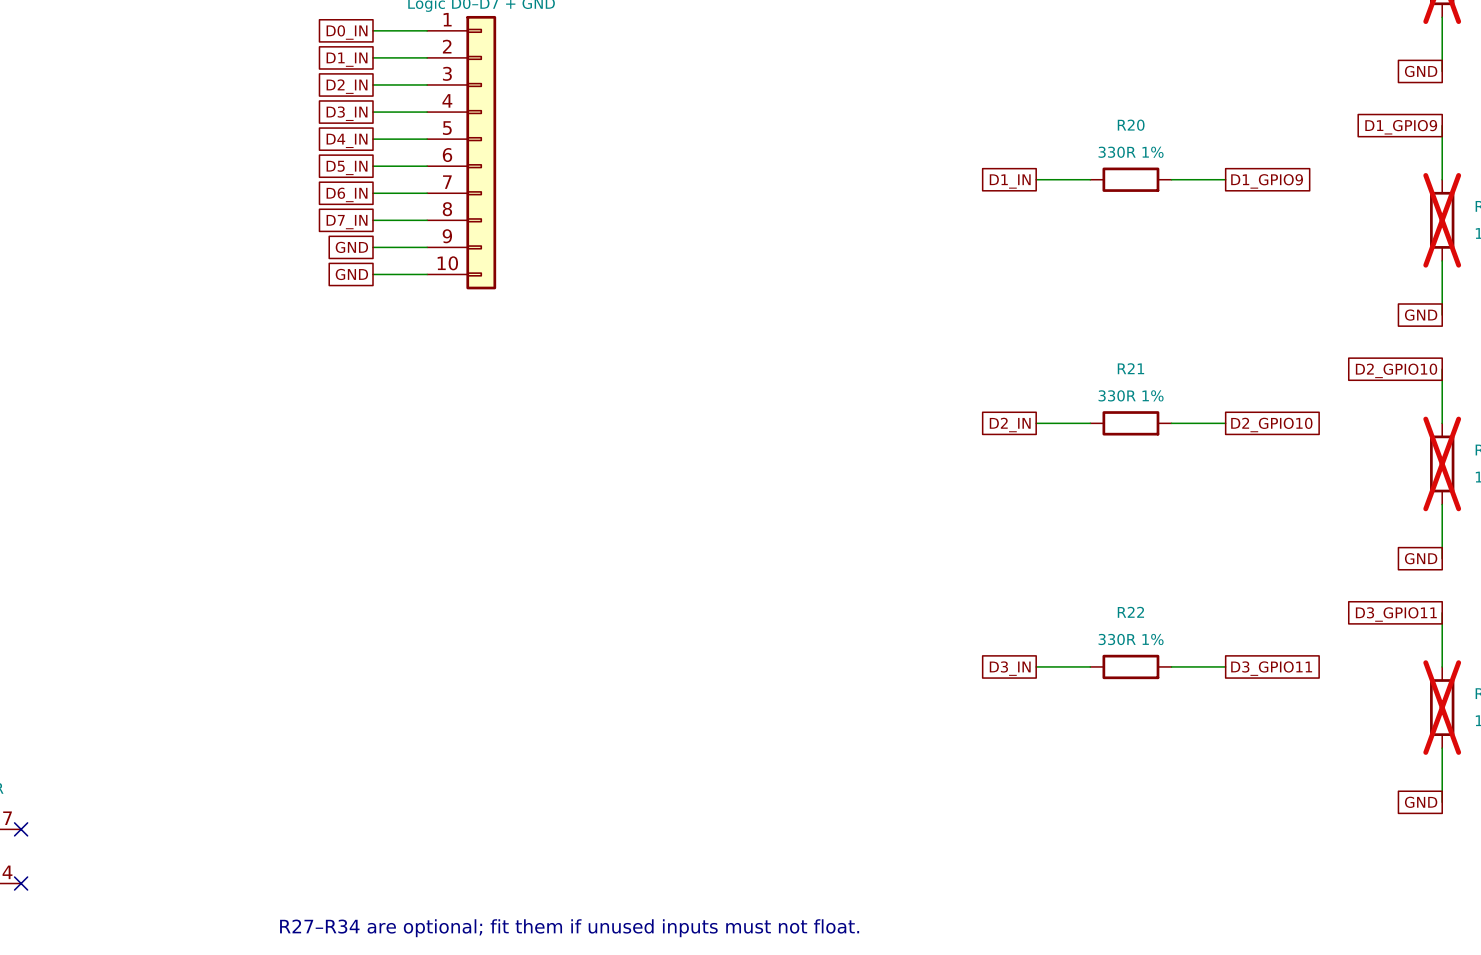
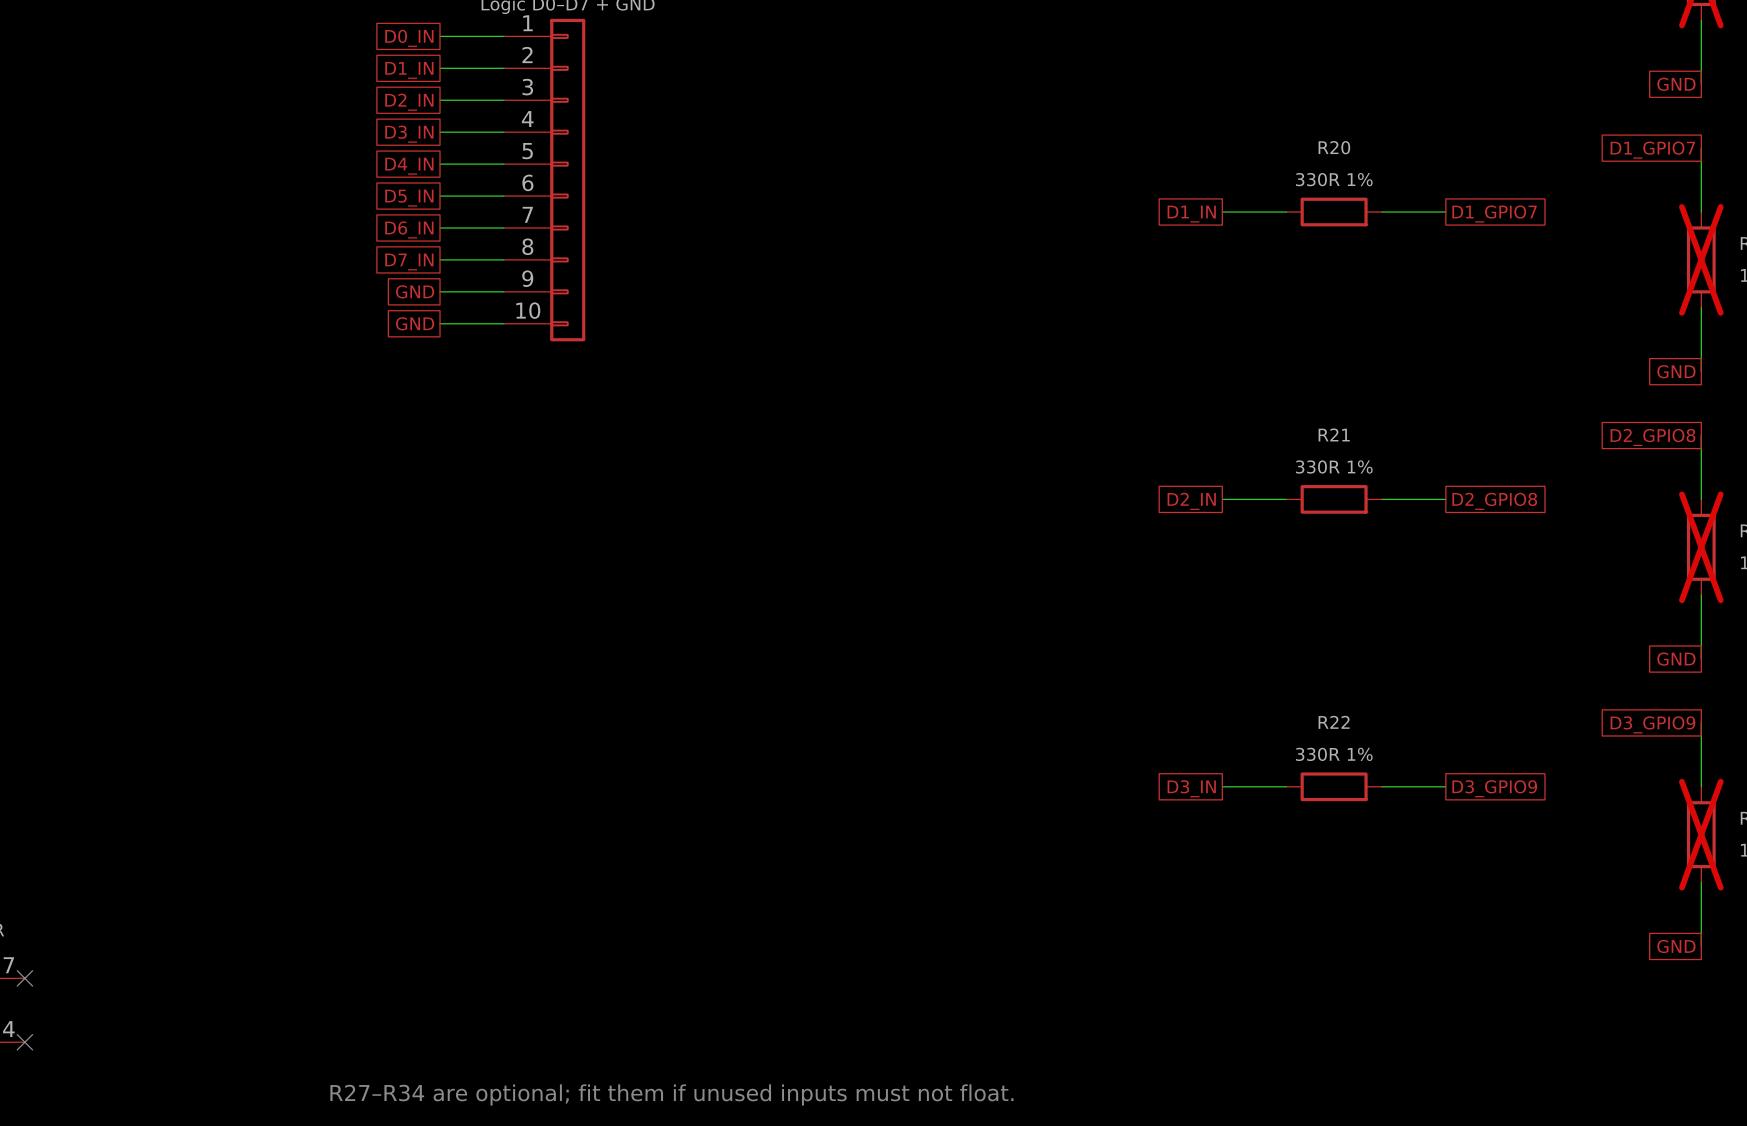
global label: D1_GPIO9 (1401, 127) -> D1_GPIO7 (1652, 150)
global label: D1_GPIO9 (1267, 181) -> D1_GPIO7 (1494, 213)
global label: D2_GPIO10 (1396, 370) -> D2_GPIO8 (1652, 437)
global label: D2_GPIO10 (1271, 425) -> D2_GPIO8 (1494, 501)
global label: D3_GPIO11 (1396, 614) -> D3_GPIO9 (1652, 724)
global label: D3_GPIO11 (1271, 668) -> D3_GPIO9 (1494, 788)

